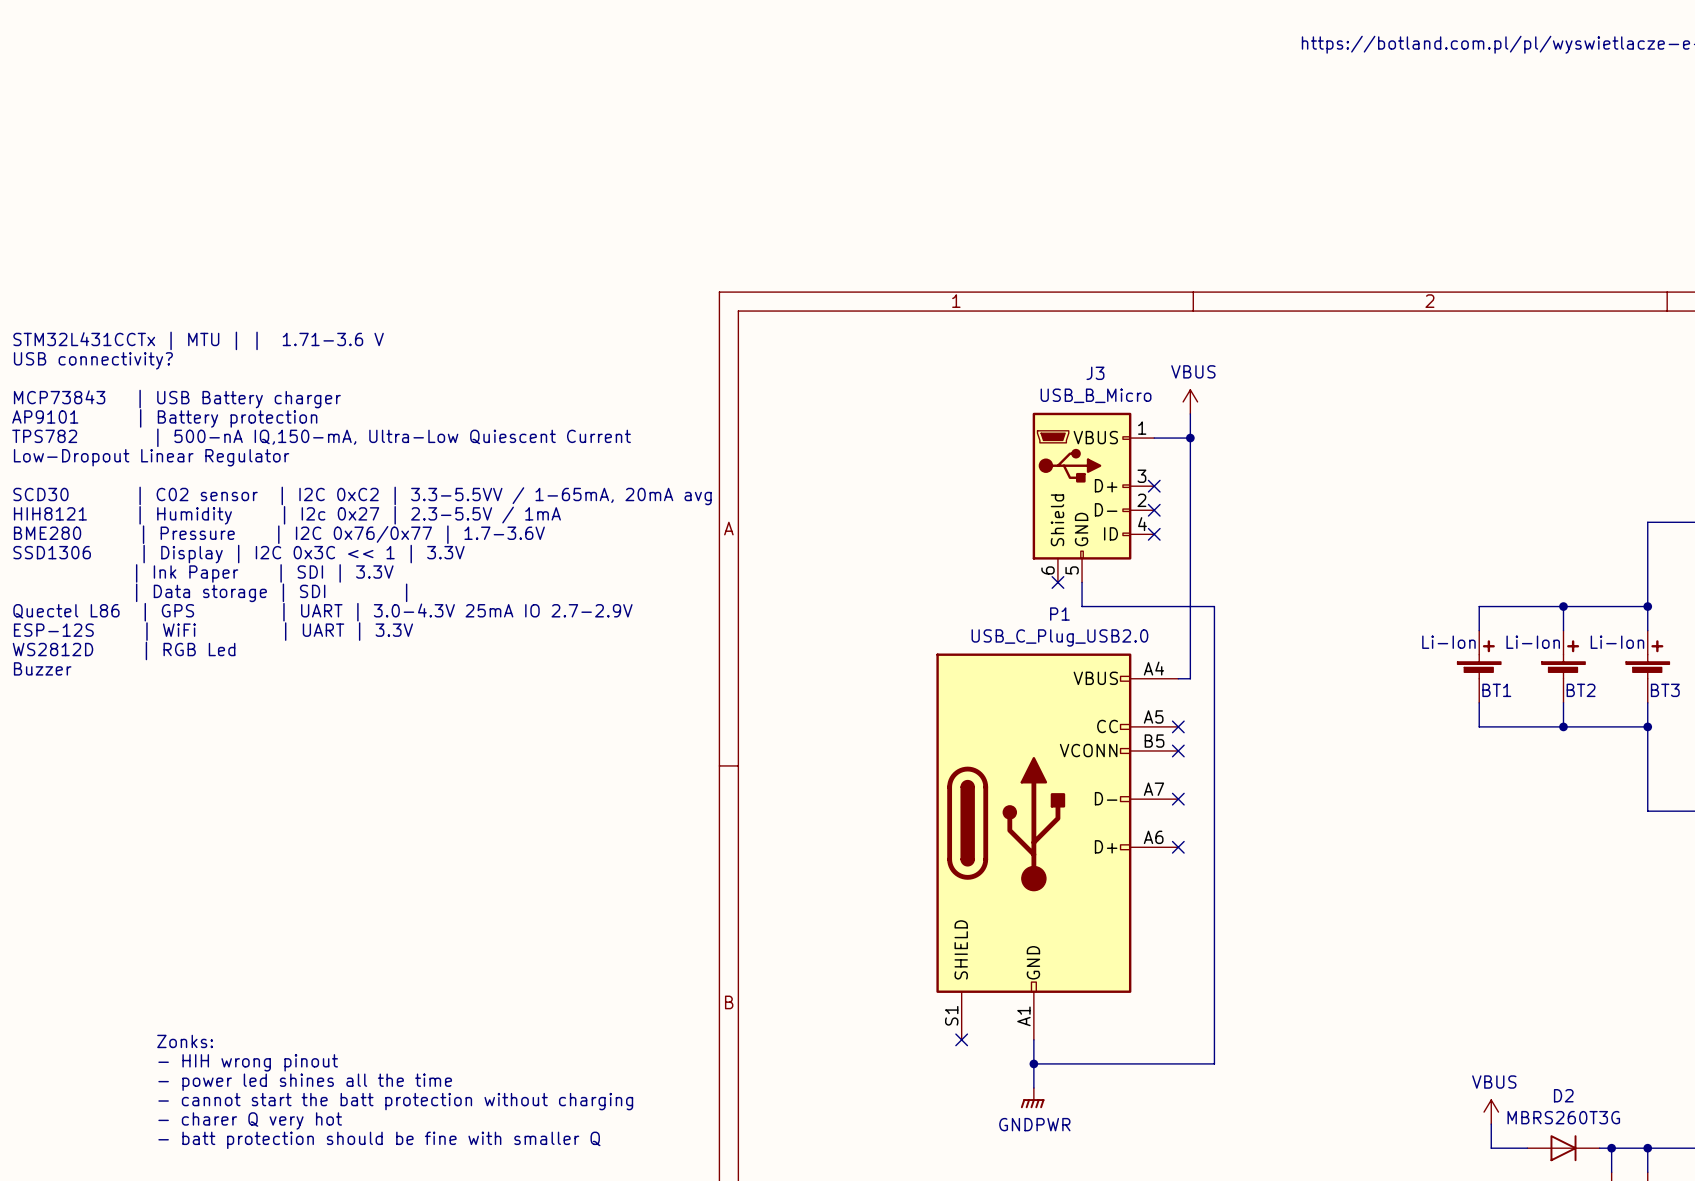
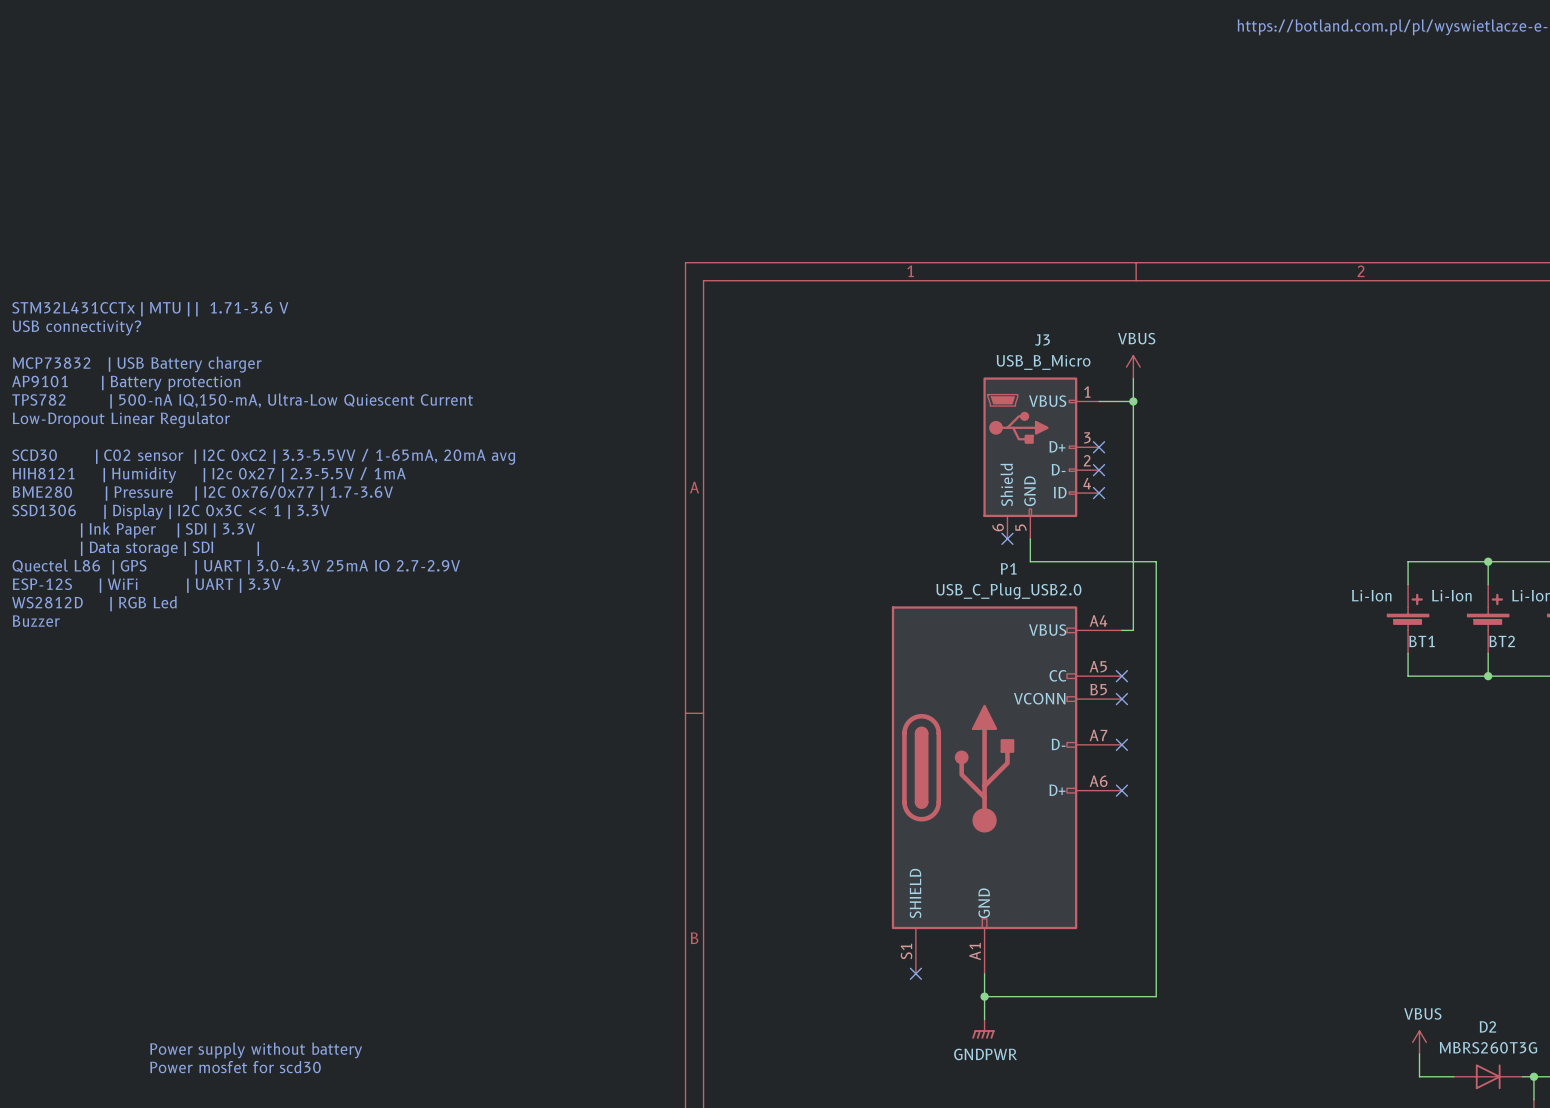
text: MCP73843 | USB Battery charger (177, 399) -> MCP73832 | USB Battery charger (137, 364)
text: Zonks: (185, 1041) -> none
text: - HIH wrong pinout (248, 1062) -> none
text: - power led shines all the time (305, 1082) -> none
text: - cannot start the batt protection without charging (395, 1101) -> none
text: - charer Q very hot (250, 1120) -> Power supply without battery (256, 1050)
text: - batt protection should be fine with smaller Q (379, 1140) -> Power mosfet for scd30 (235, 1067)

